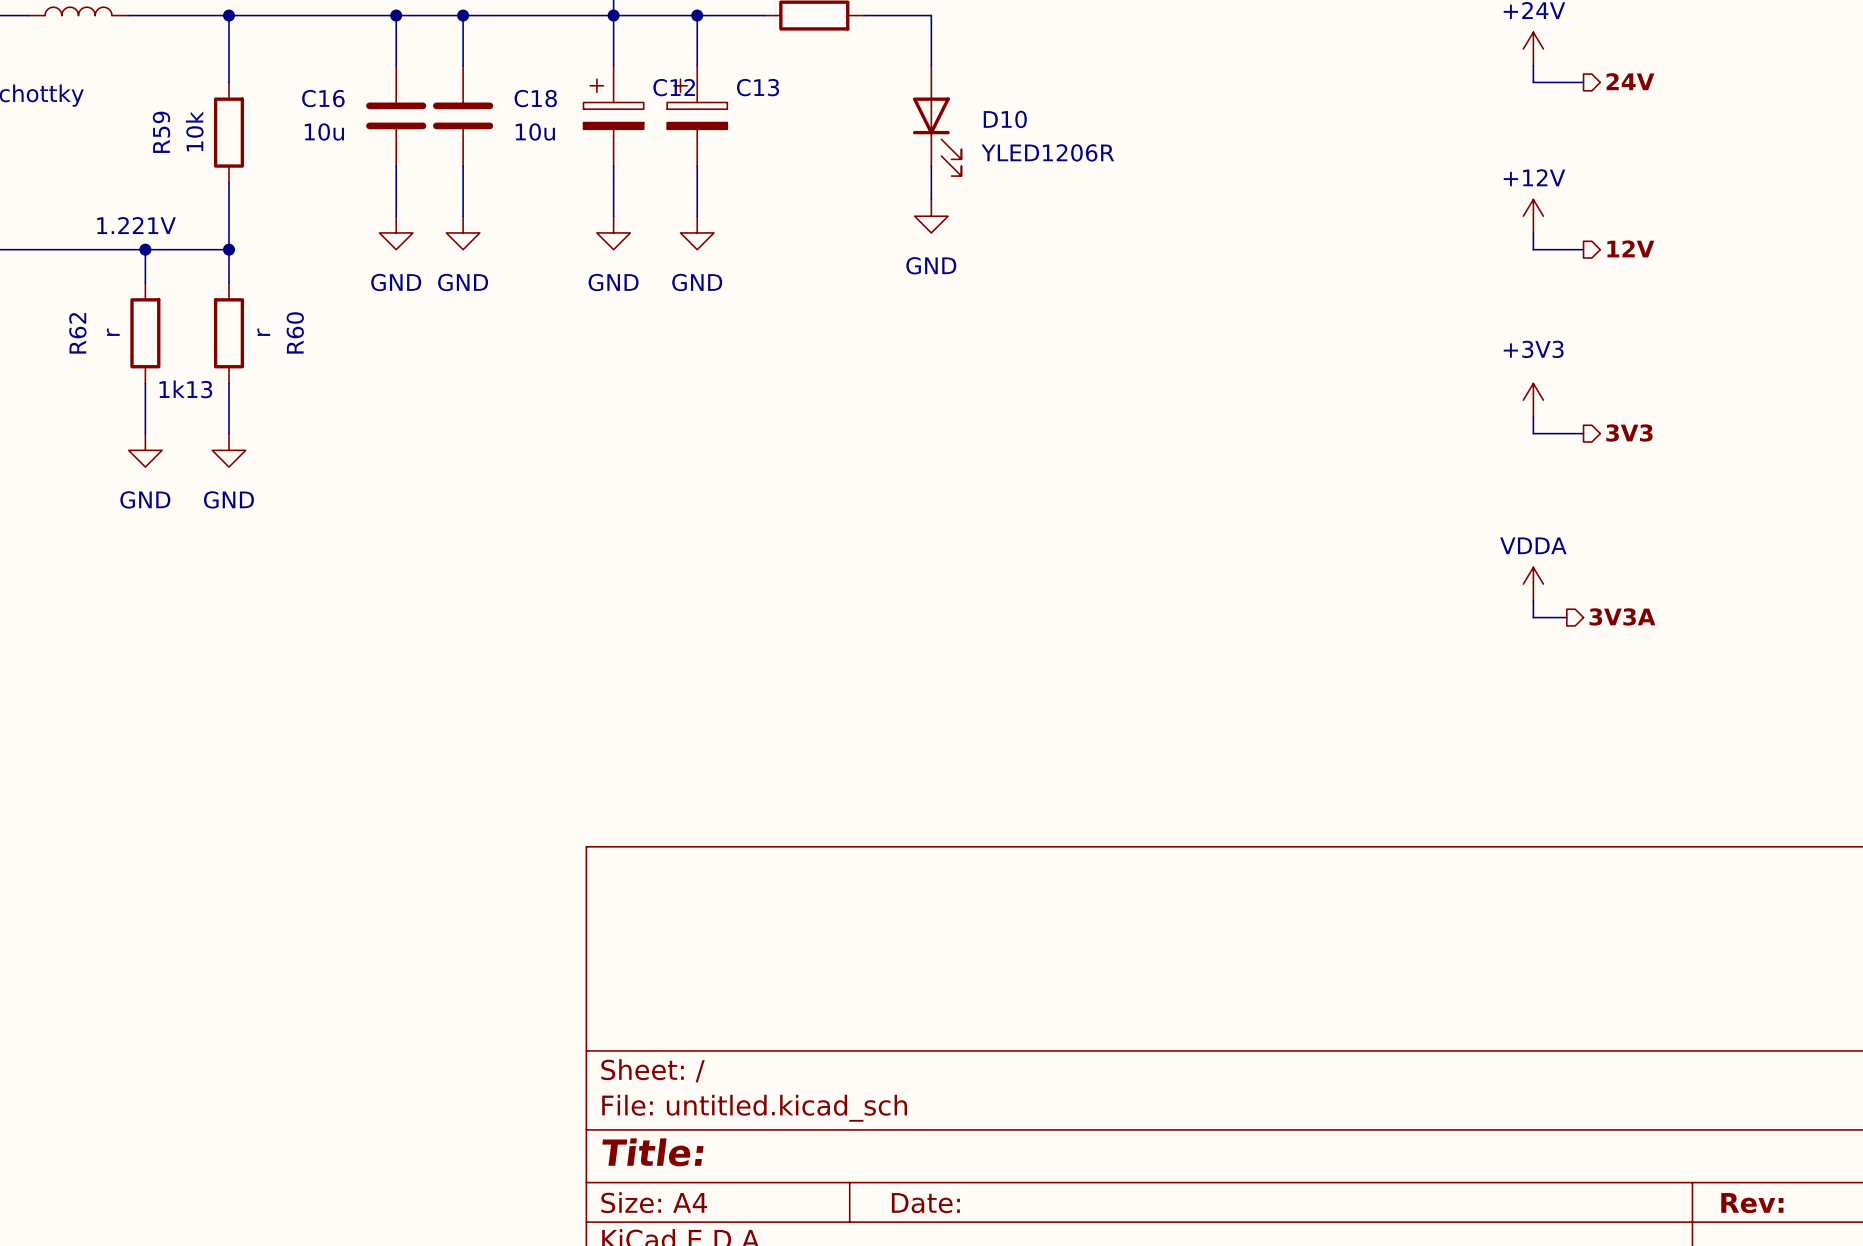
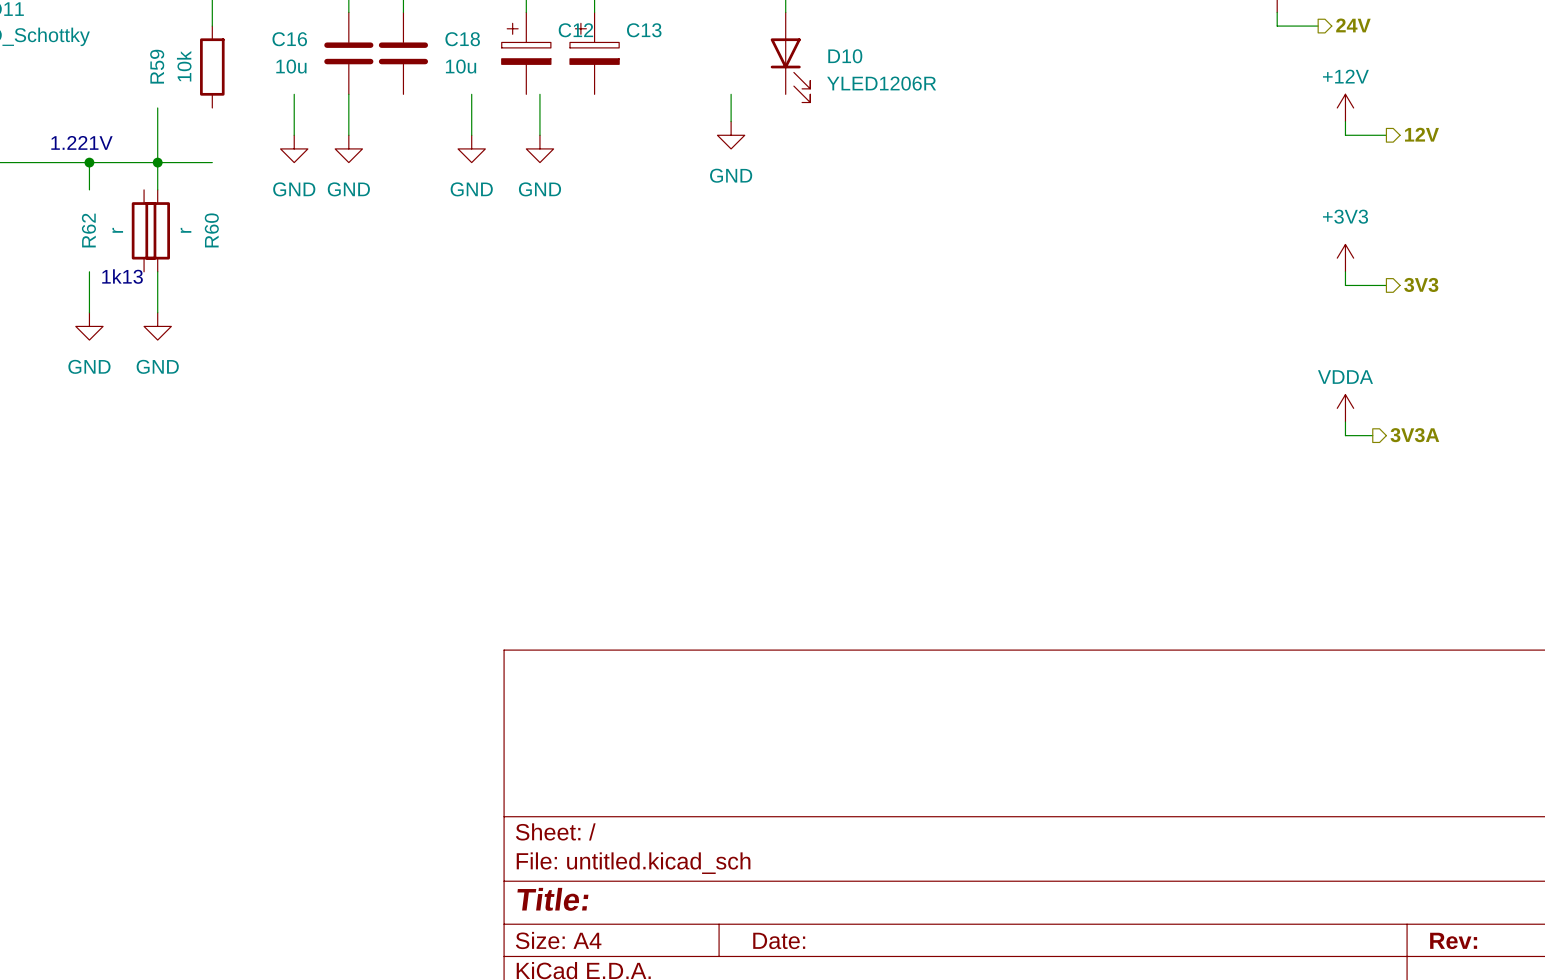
wire: (463, 166) (463, 216) -> (294, 94) (294, 135)
wire: (613, 166) (613, 216) -> (471, 94) (471, 135)
wire: (697, 166) (697, 216) -> (539, 94) (539, 135)
wire: (931, 166) (931, 199) -> (731, 94) (731, 121)
wire: (228, 182) (228, 283) -> (157, 107) (157, 189)
power symbol position: GND (931, 216) -> GND (731, 135)
power symbol position: +12V (1533, 216) -> +12V (1345, 107)
text position: 1.221V (136, 225) -> 1.221V (81, 142)
power symbol: none -> GND (294, 148)
power symbol: GND (463, 232) -> none
power symbol: none -> GND (471, 148)
power symbol position: GND (613, 232) -> GND (539, 148)
power symbol: GND (697, 232) -> none
wire: (1533, 232) (1533, 249) (1583, 249) -> (1345, 121) (1345, 135) (1386, 135)
hierarchical label position: 12V (1630, 248) -> 12V (1421, 134)
junction: none -> (89, 162)
wire: (145, 249) (145, 283) -> (89, 162) (89, 189)
junction position: (145, 249) -> (157, 162)
junction: (228, 249) -> none
R60 position: (228, 333) -> (157, 230)
wire: (145, 383) (145, 433) -> (89, 271) (89, 312)
wire: (228, 383) (228, 433) -> (157, 271) (157, 312)
text position: 1k13 (185, 389) -> 1k13 (122, 276)
power symbol position: +3V3 (1533, 400) -> +3V3 (1345, 258)
wire: (1533, 416) (1533, 433) (1583, 433) -> (1345, 271) (1345, 285) (1386, 285)
hierarchical label position: 3V3 (1629, 433) -> 3V3 (1421, 284)
power symbol: none -> GND (89, 326)
power symbol position: GND (145, 450) -> GND (157, 326)
power symbol: GND (228, 450) -> none
power symbol position: VDDA (1533, 584) -> VDDA (1345, 408)
wire: (1533, 600) (1533, 617) (1566, 617) -> (1345, 421) (1345, 435) (1372, 435)
hierarchical label position: 3V3A (1622, 616) -> 3V3A (1414, 435)

